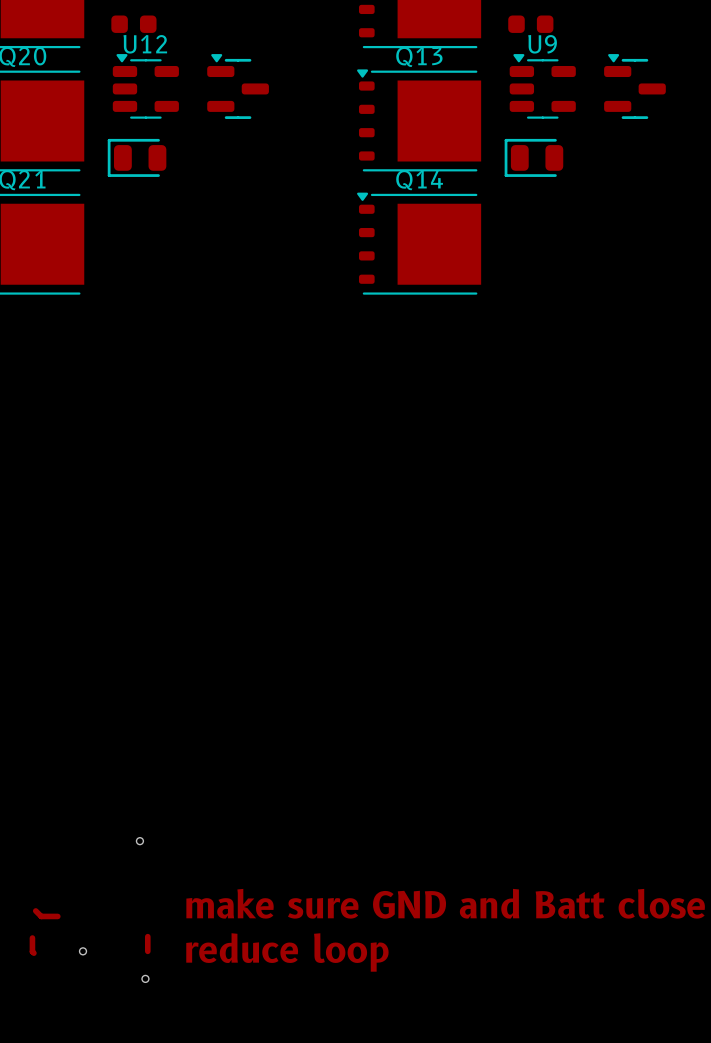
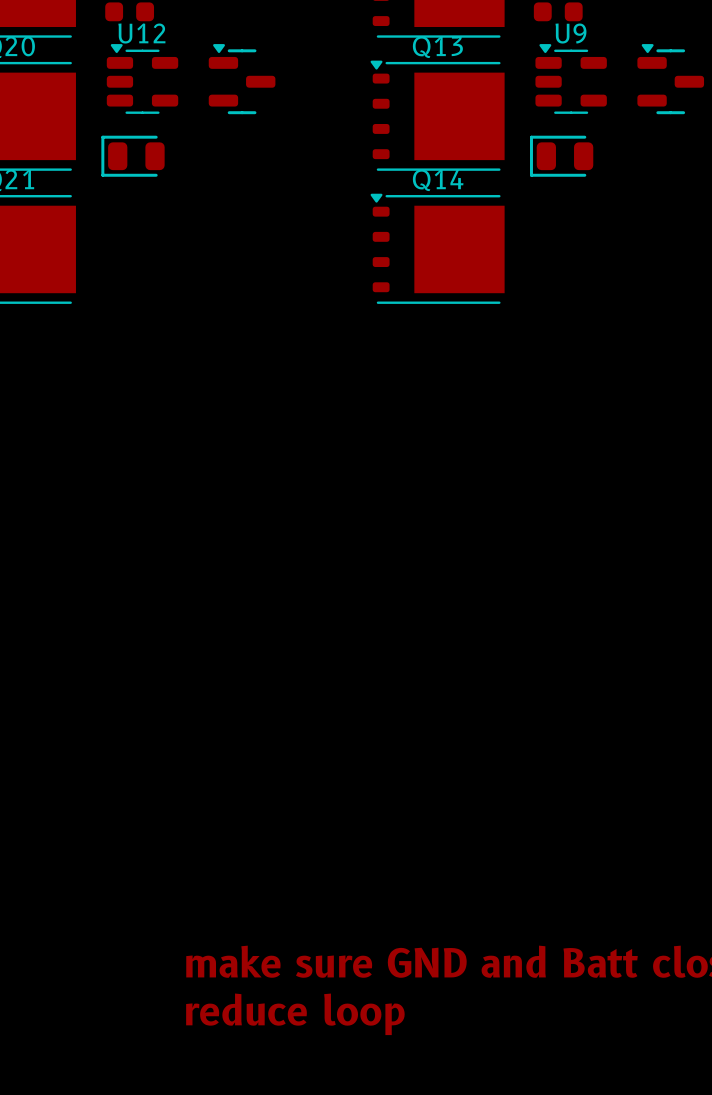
via: (139, 841) -> none
track: (35, 910) (41, 916) (57, 916) -> none
track: (147, 936) (147, 951) -> none
track: (32, 938) (33, 953) -> none
via: (83, 951) -> none
via: (145, 978) -> none

